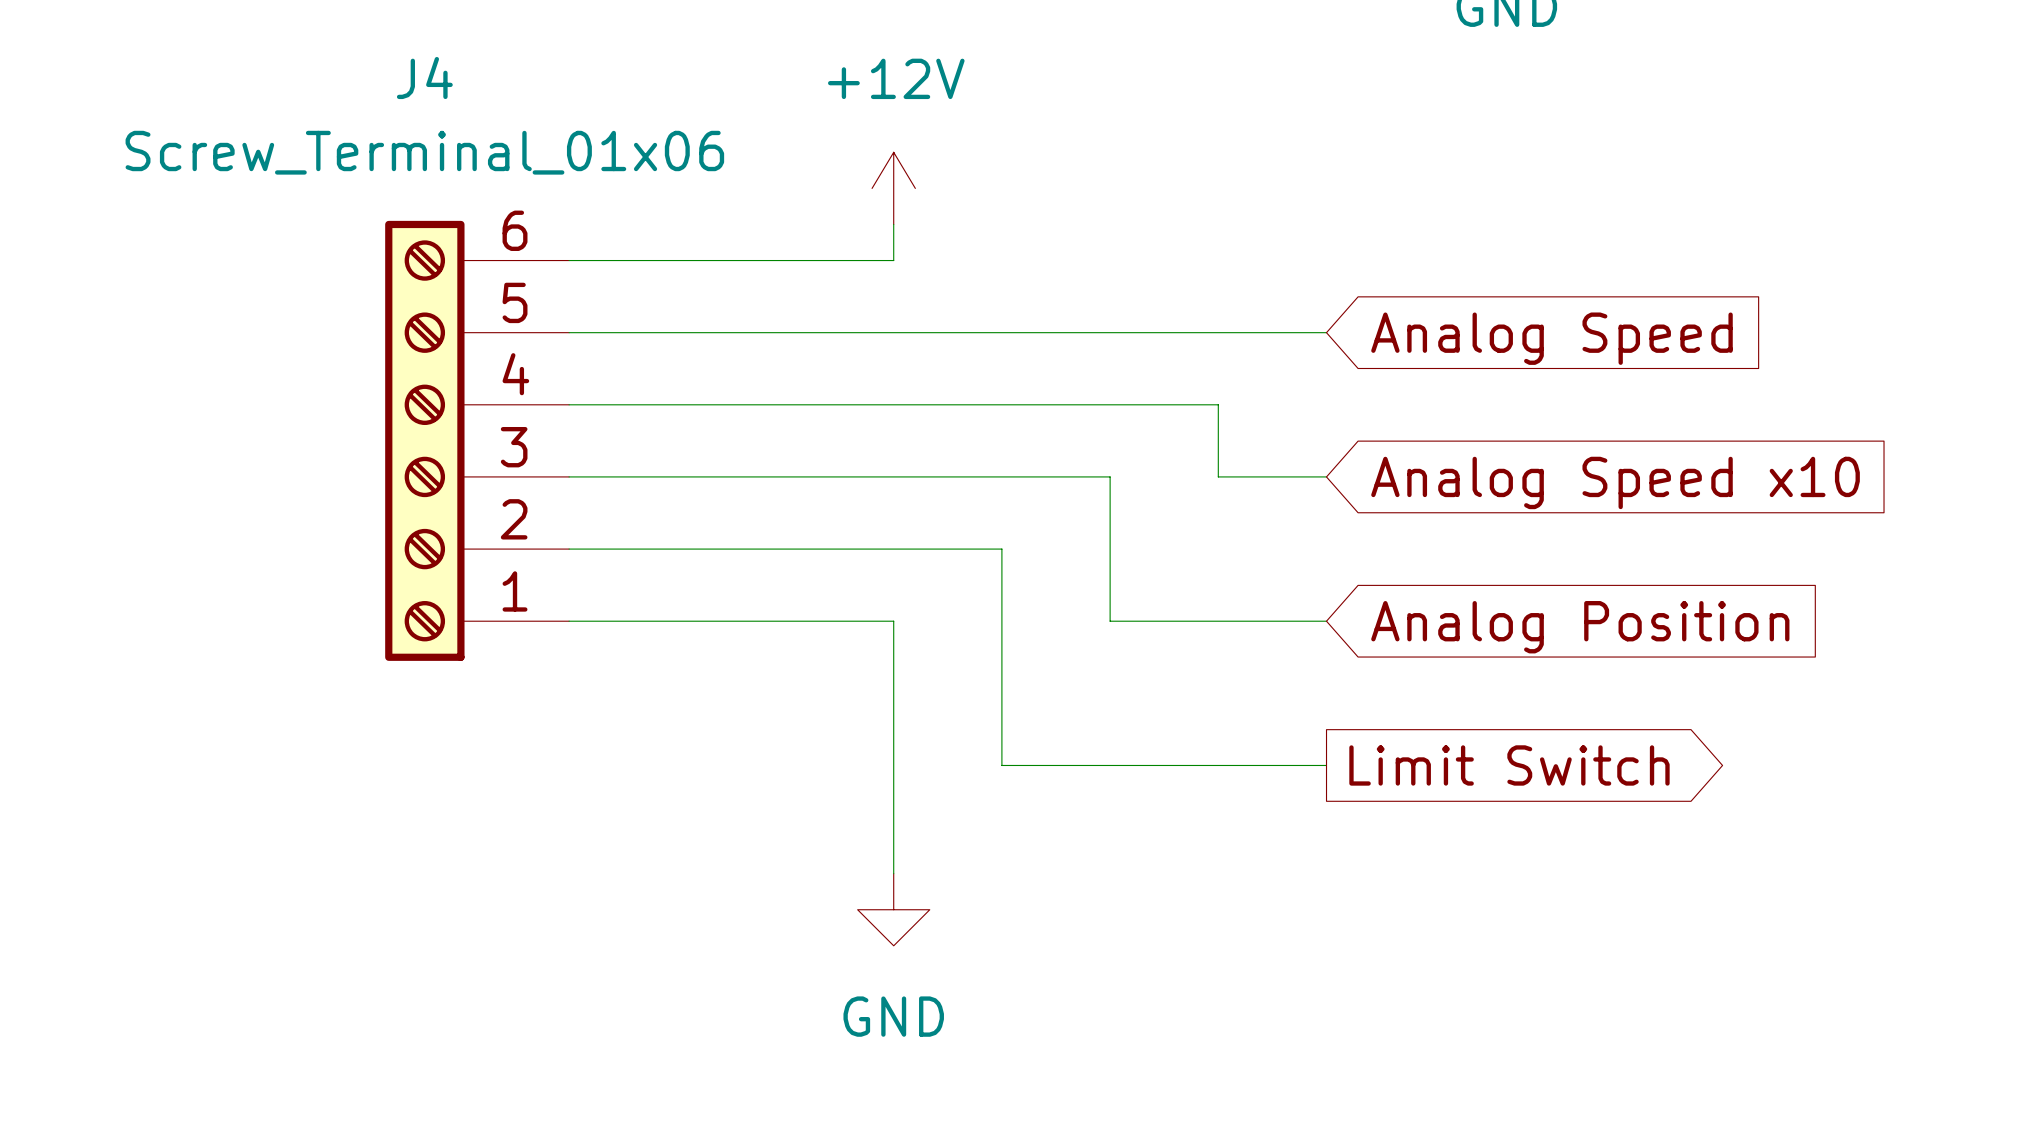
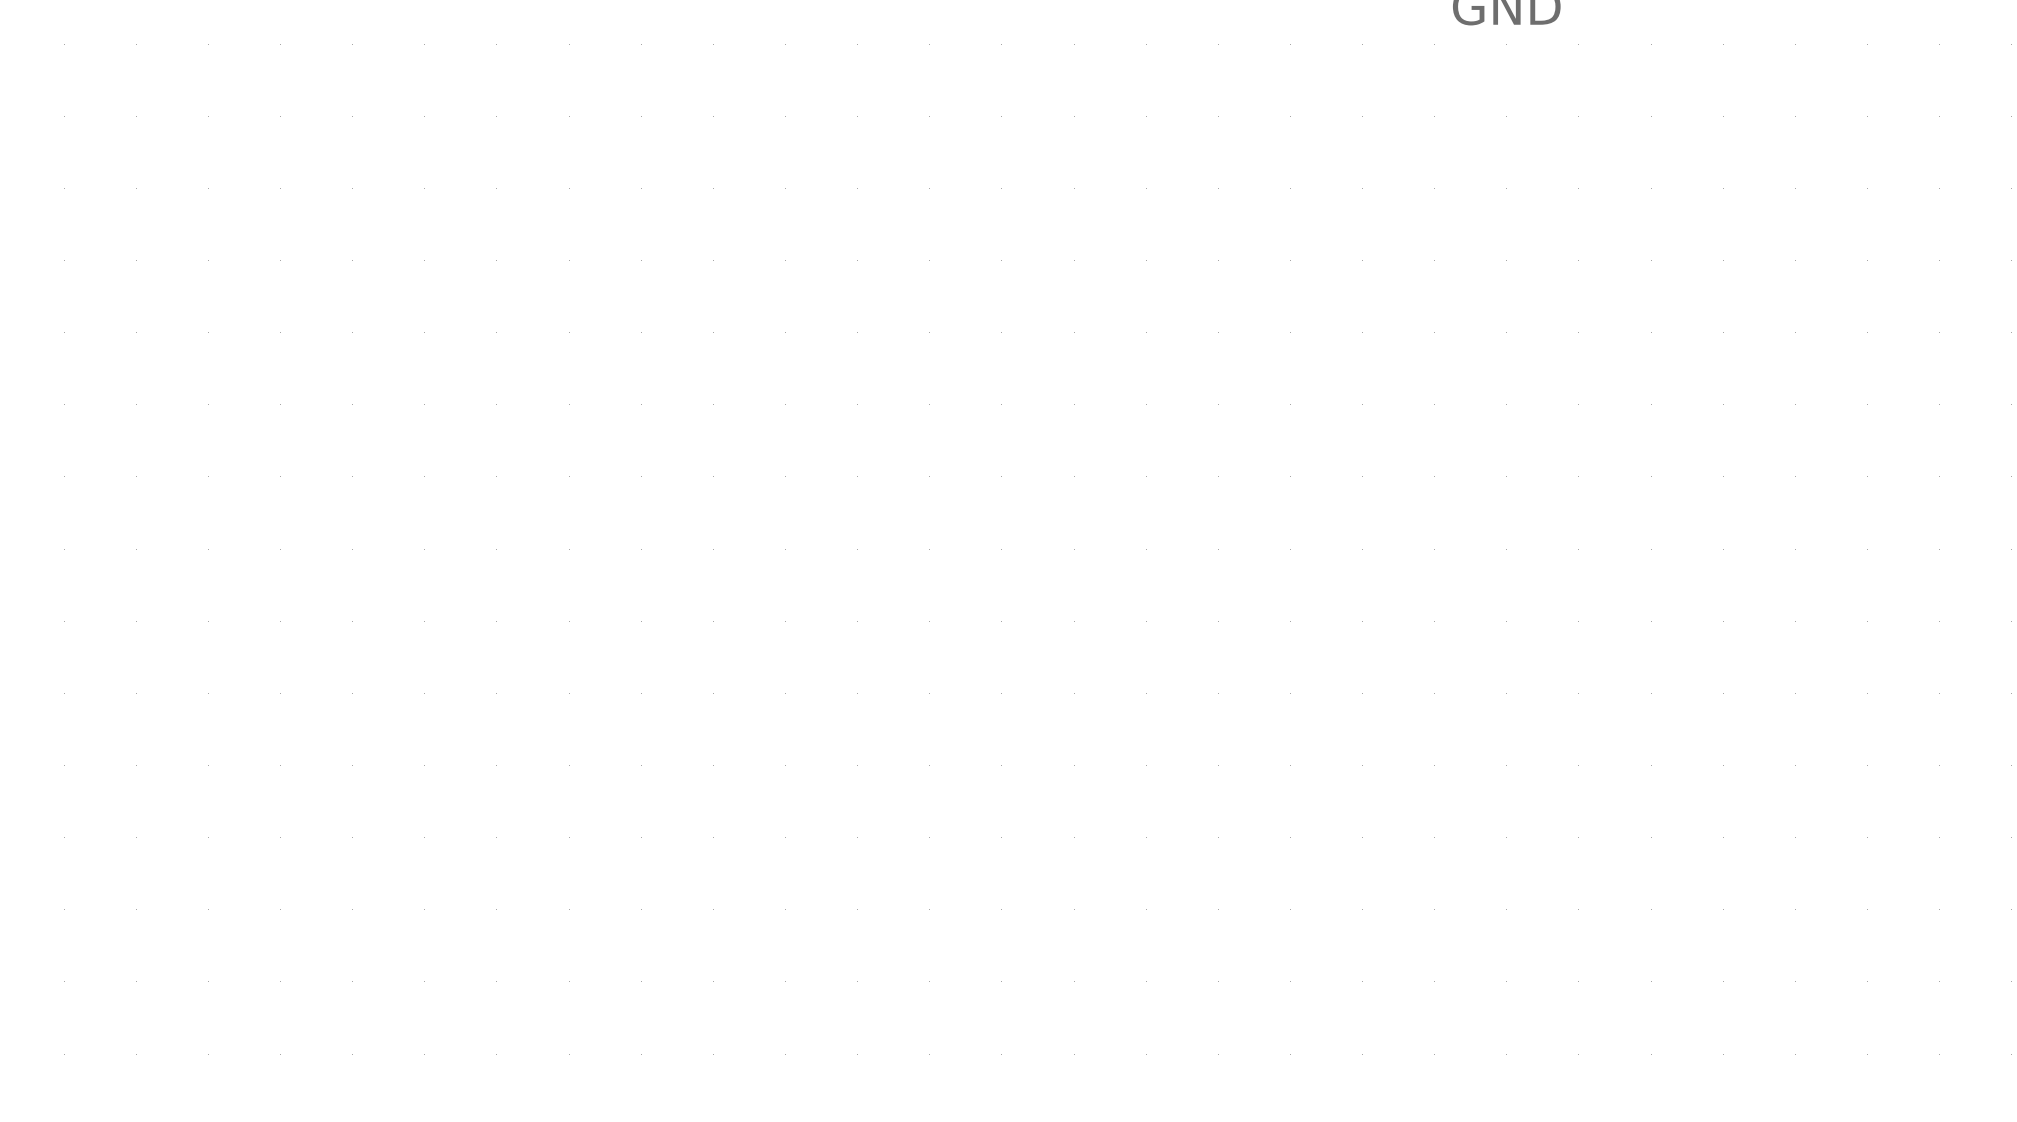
power symbol: +12V (893, 188) -> none
wire: (893, 224) (893, 260) (569, 260) -> none
wire: (569, 332) (1326, 332) -> none
global label: Analog Speed (1551, 338) -> none
wire: (569, 404) (1218, 404) (1218, 476) (1326, 476) -> none
J4: Screw_Terminal_01x06 (477, 440) -> none
wire: (569, 476) (1110, 476) (1110, 621) (1326, 621) -> none
global label: Analog Speed x10 (1615, 482) -> none
wire: (569, 549) (1001, 549) (1001, 765) (1326, 765) -> none
wire: (569, 621) (893, 621) (893, 873) -> none
global label: Analog Position (1580, 627) -> none
global label: Limit Switch (1509, 765) -> none
power symbol: GND (893, 909) -> none

